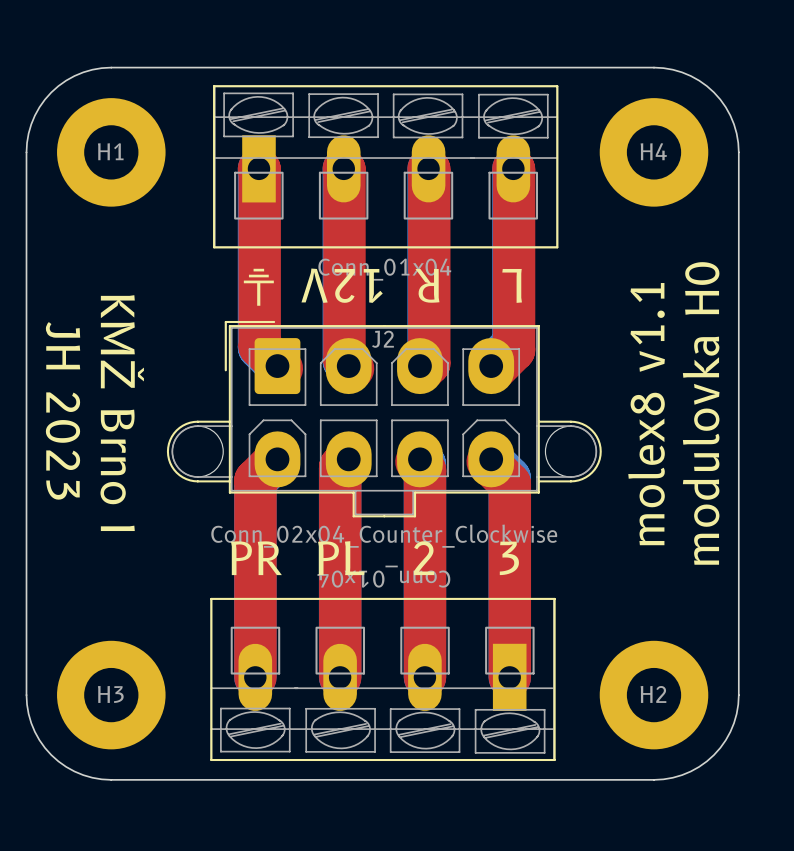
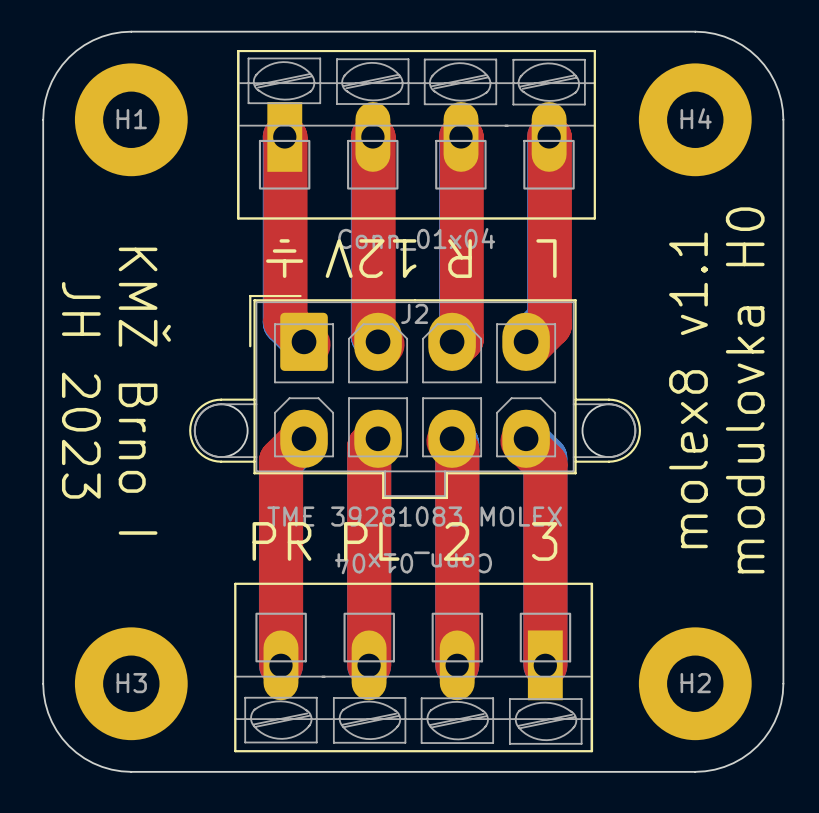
J2 value: Conn_02x04_Counter_Clockwise (384, 536) -> TME 39281083 MOLEX (414, 516)

